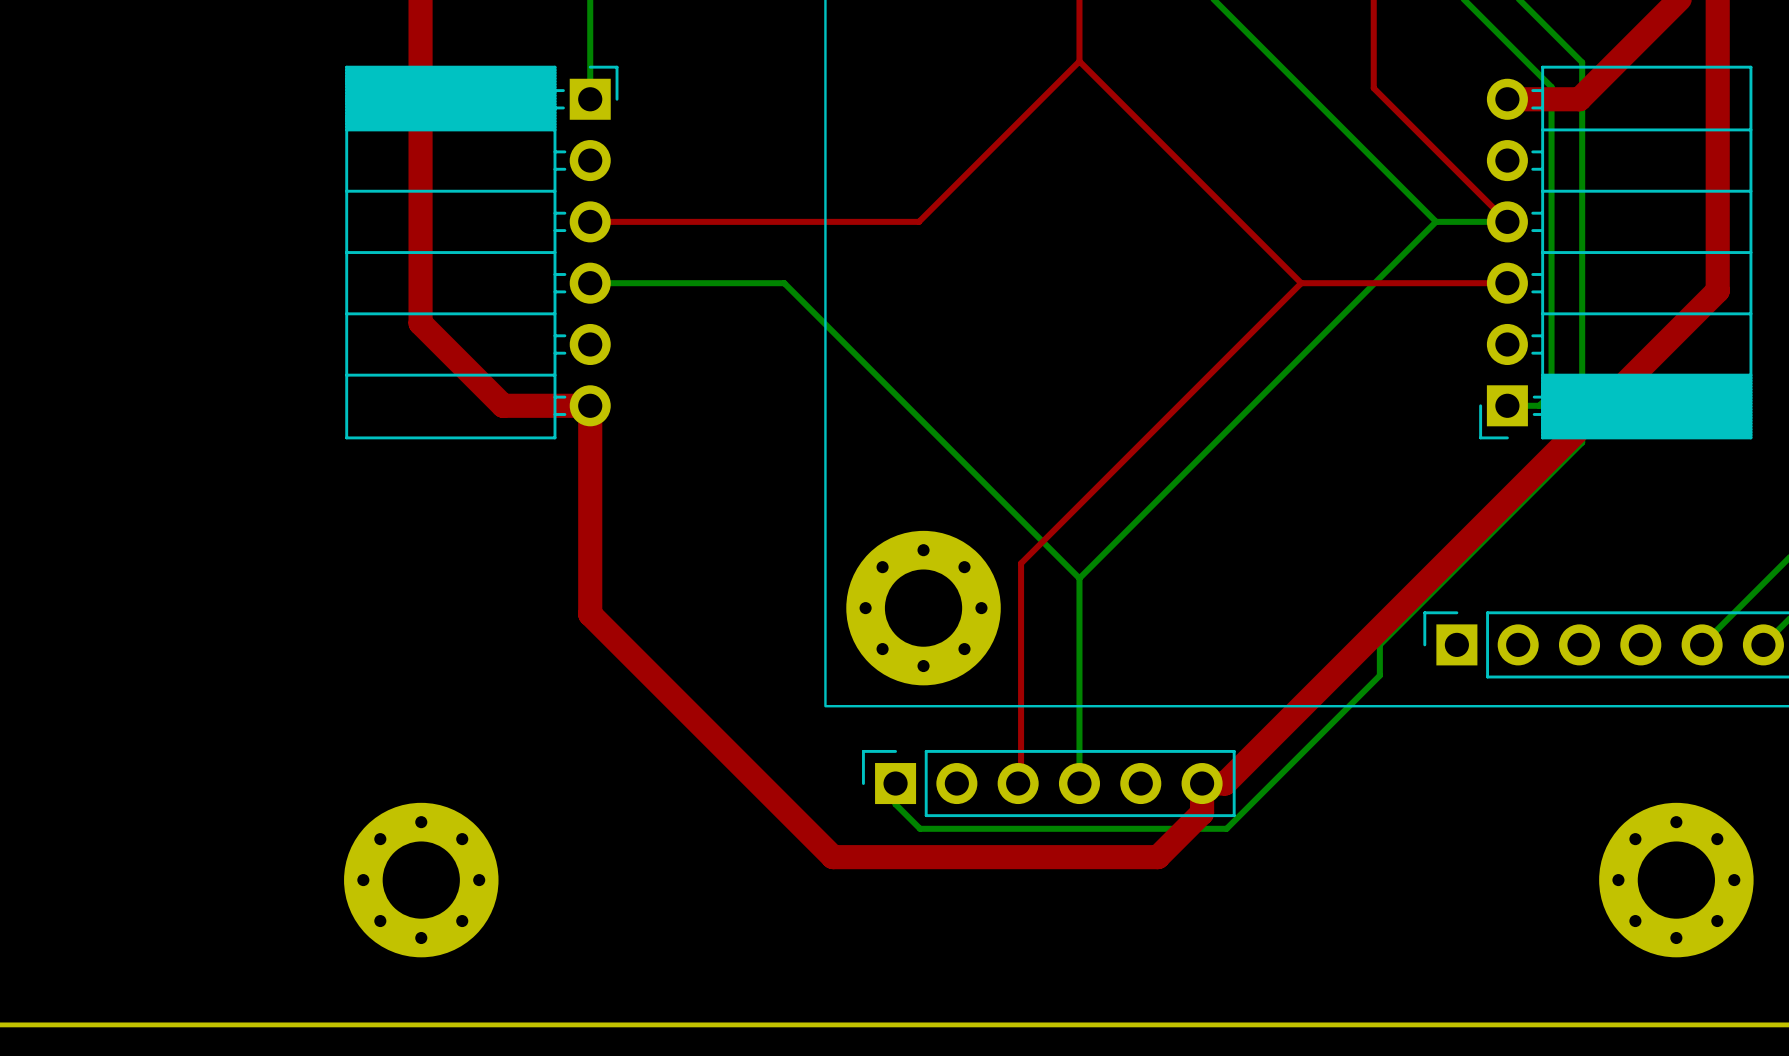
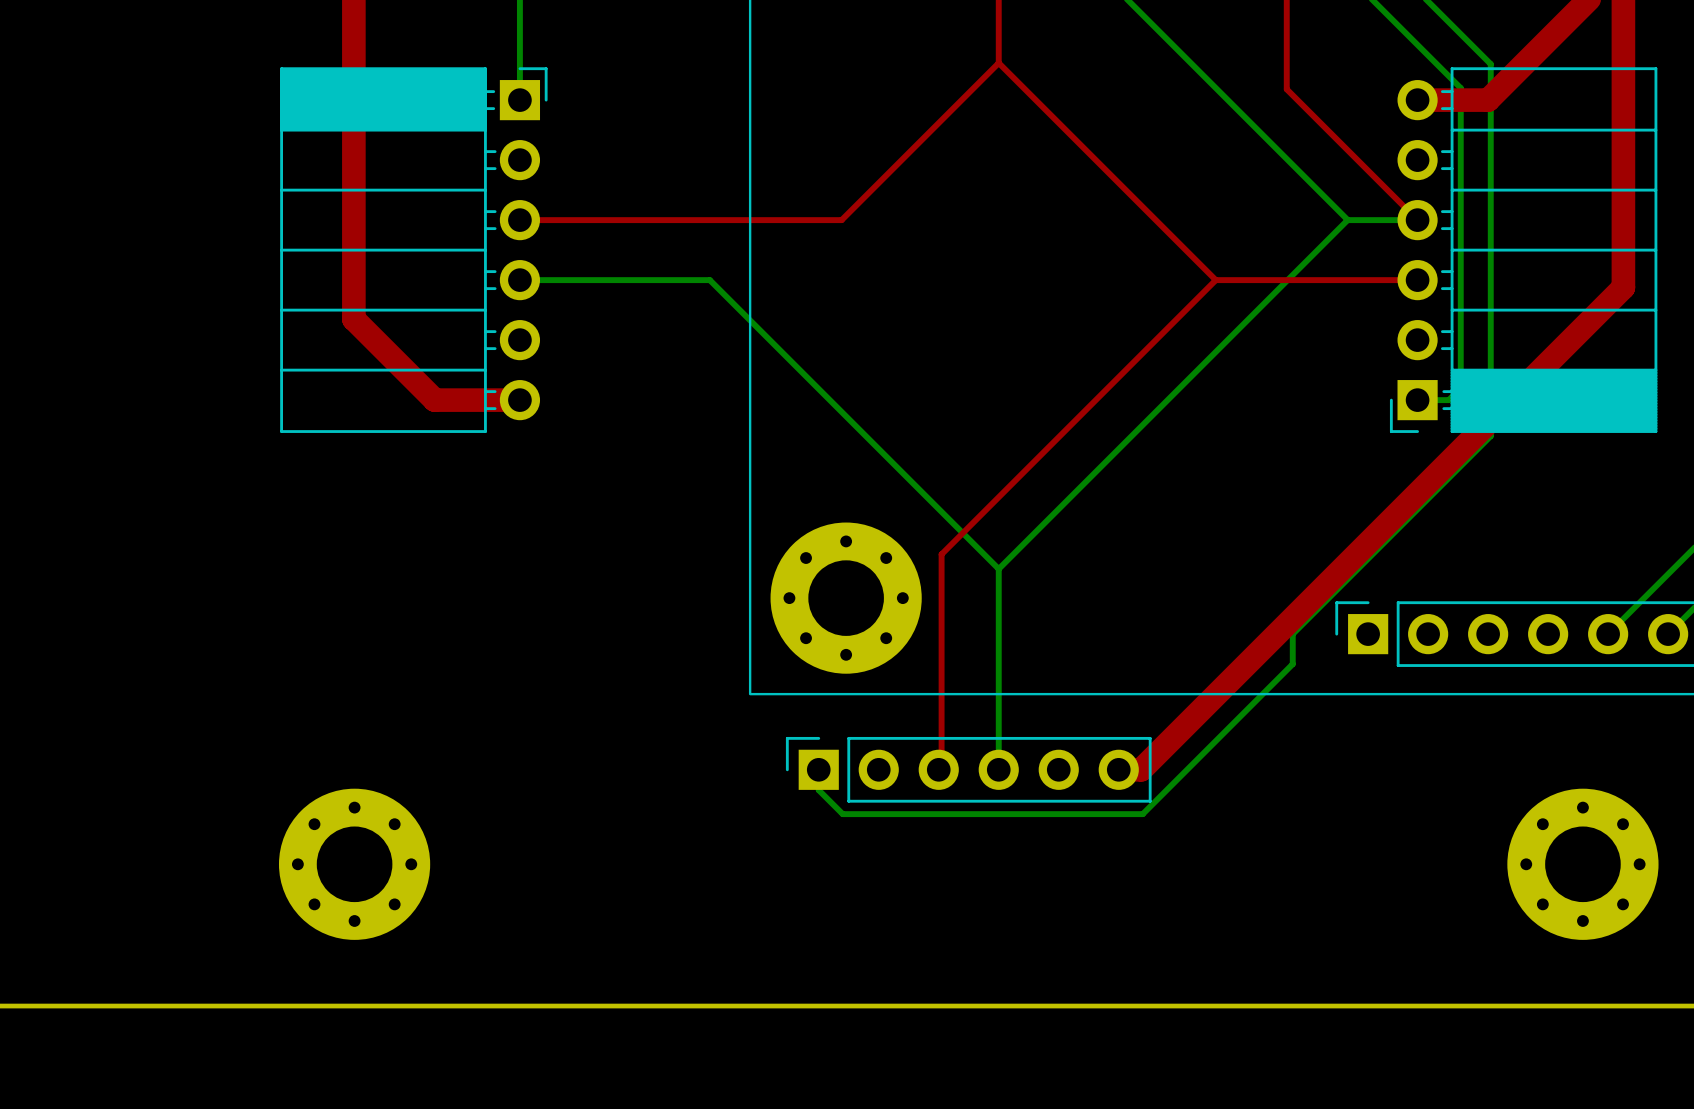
top track: (590, 405) (590, 614) (833, 857) (1157, 857) (1202, 812) (1202, 783) -> none

